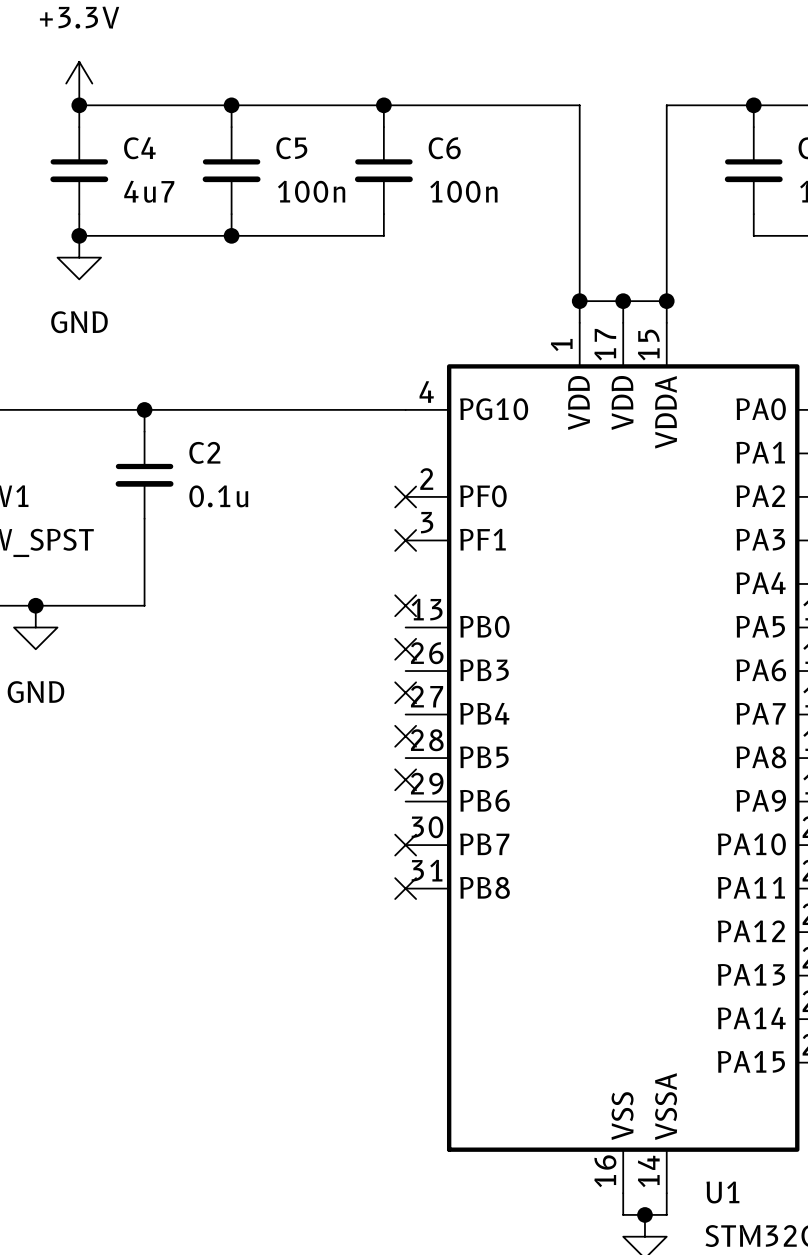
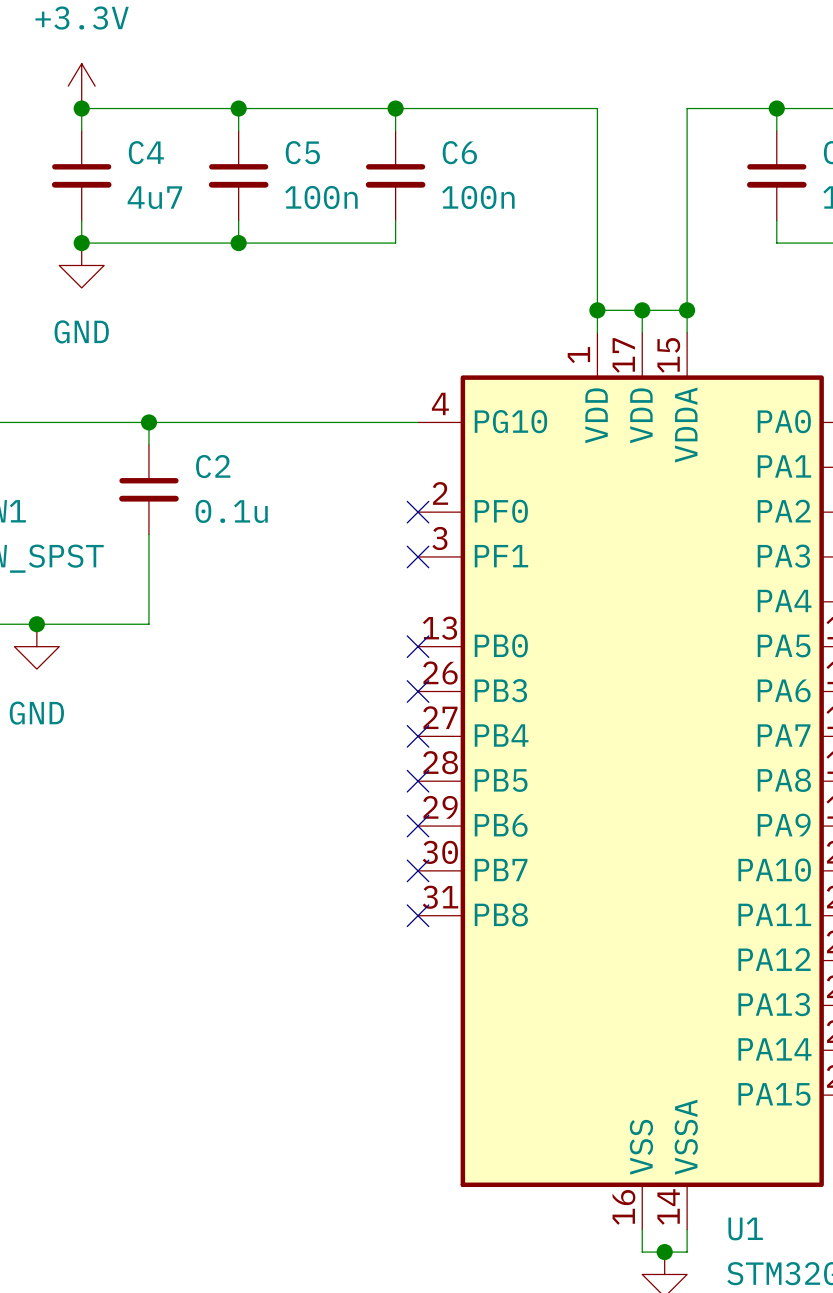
no-connect mark: (405, 605) -> none
no-connect mark: none -> (418, 646)
no-connect mark: (405, 649) -> none
no-connect mark: none -> (418, 691)
no-connect mark: (405, 692) -> none
no-connect mark: none -> (418, 736)
no-connect mark: (405, 736) -> none
no-connect mark: none -> (418, 781)
no-connect mark: (405, 779) -> none
no-connect mark: none -> (418, 826)

